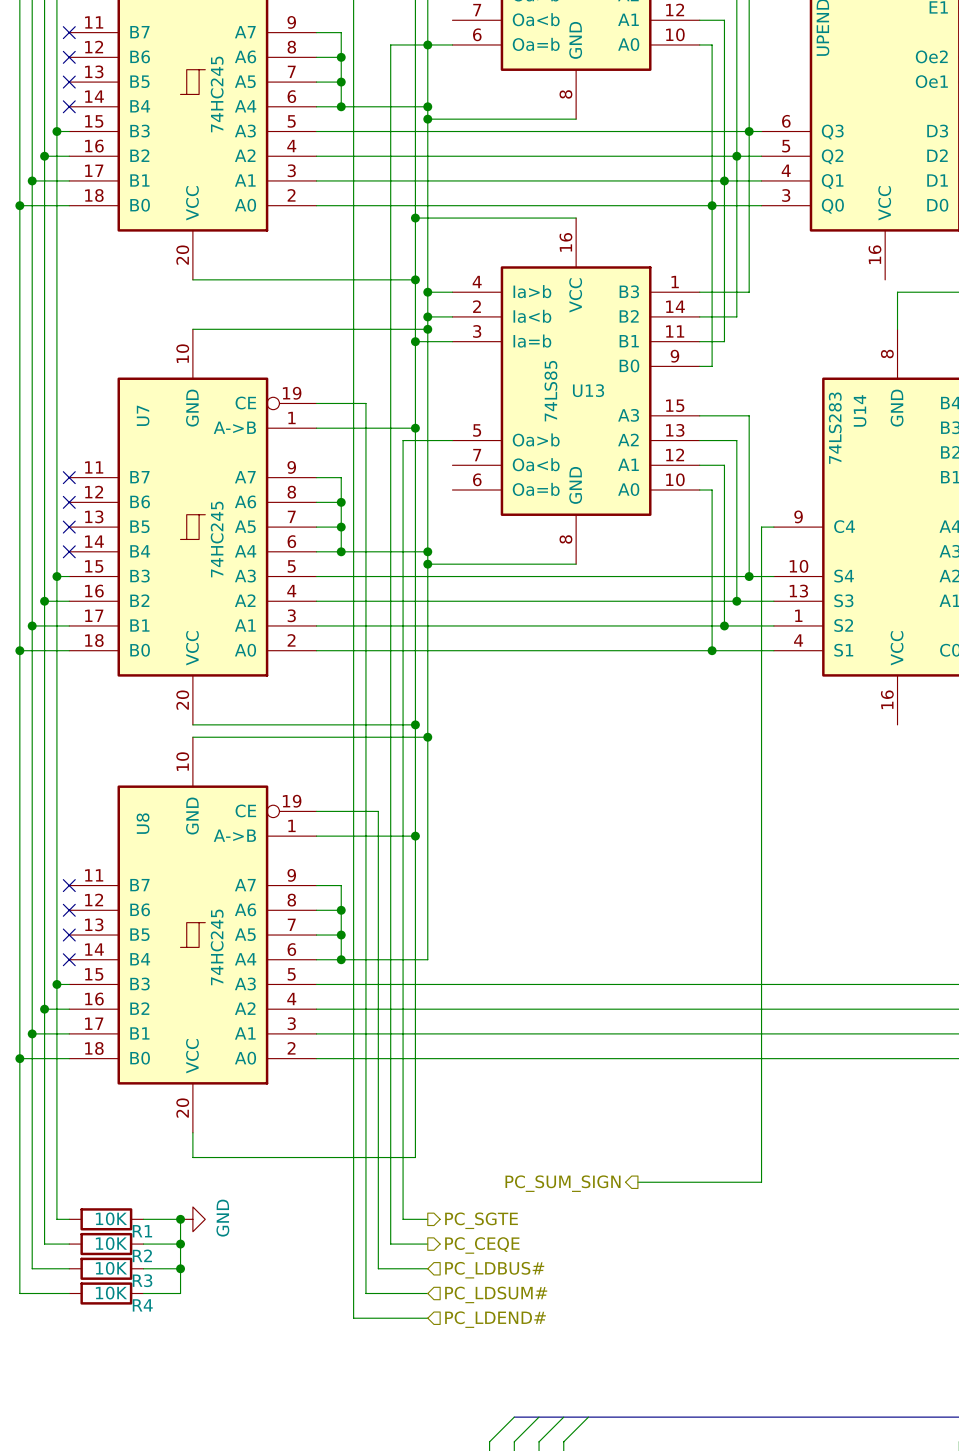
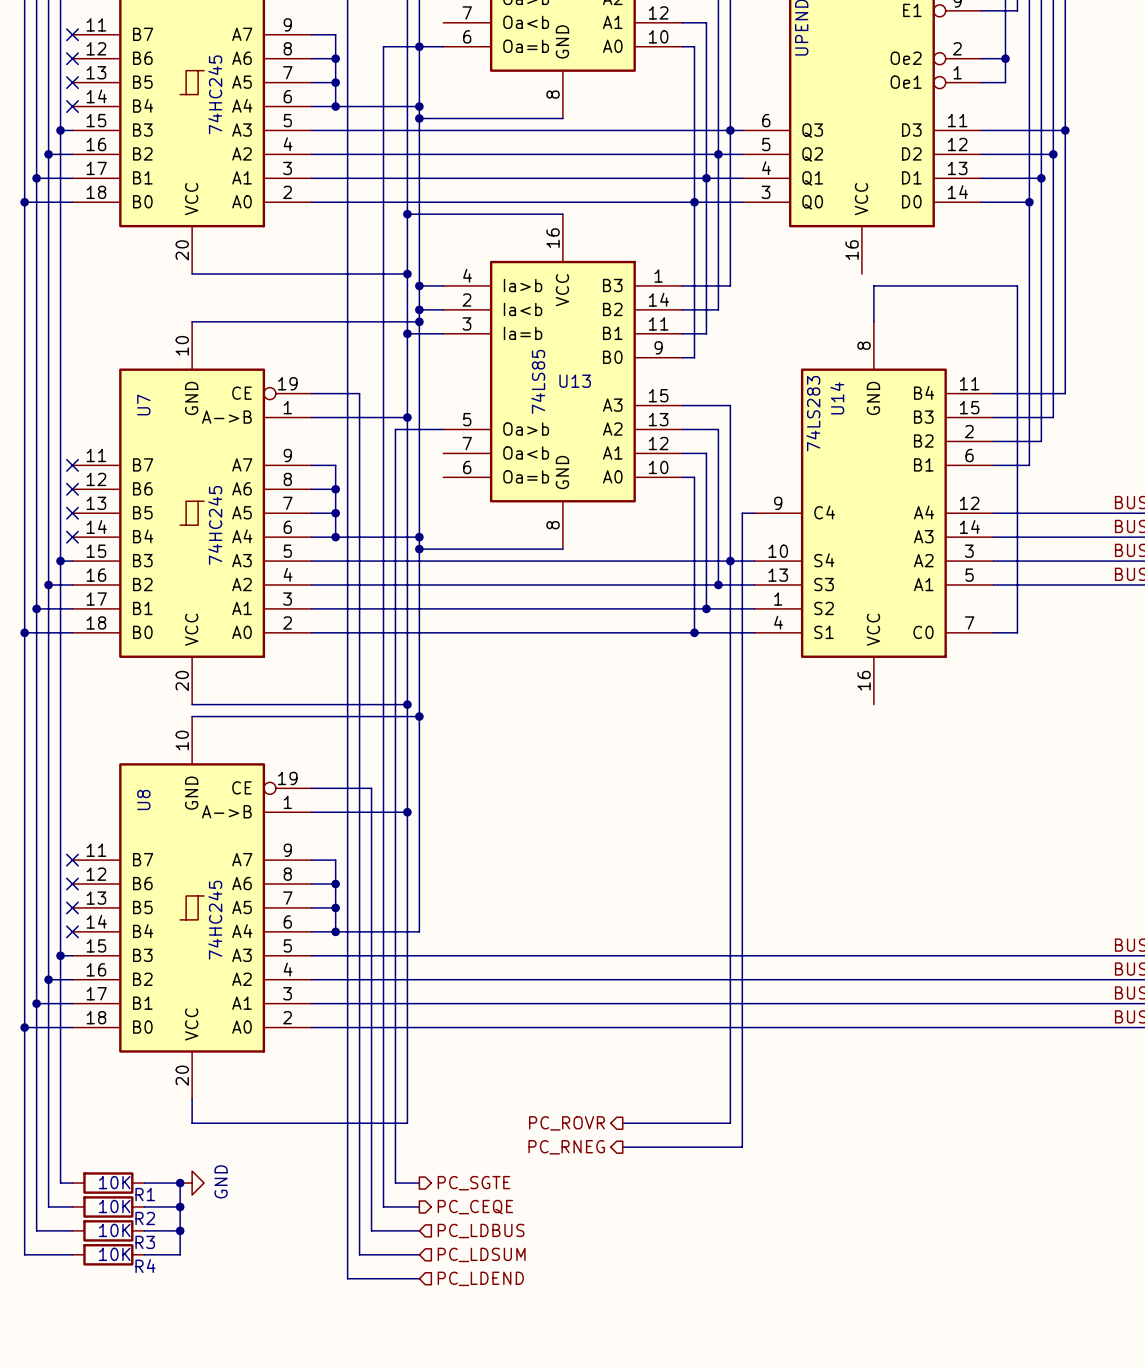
wire: none -> (730, 561) (730, 1123) (622, 1123)
hierarchical label: none -> PC_ROVR (566, 1123)
hierarchical label: PC_SUM_SIGN (563, 1183) -> PC_RNEG (566, 1147)
hierarchical label: PC_LDBUS# (494, 1270) -> PC_LDBUS (481, 1231)
hierarchical label: PC_LDSUM# (496, 1294) -> PC_LDSUM (481, 1254)
hierarchical label: PC_LDEND# (495, 1319) -> PC_LDEND (480, 1278)

